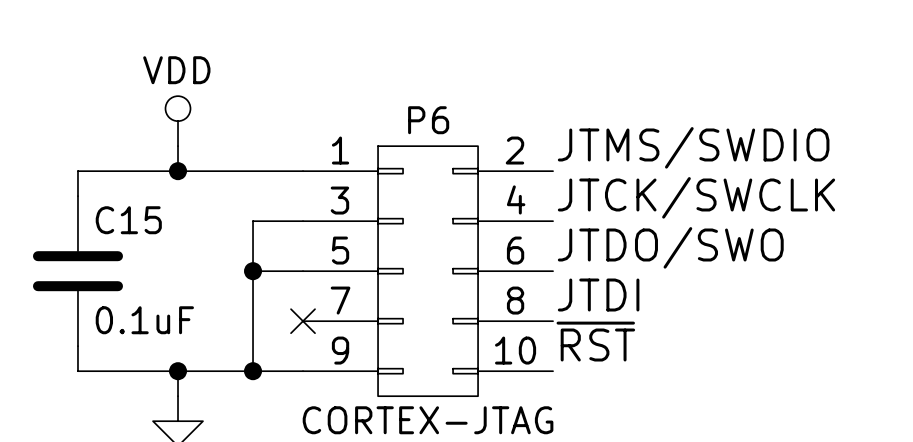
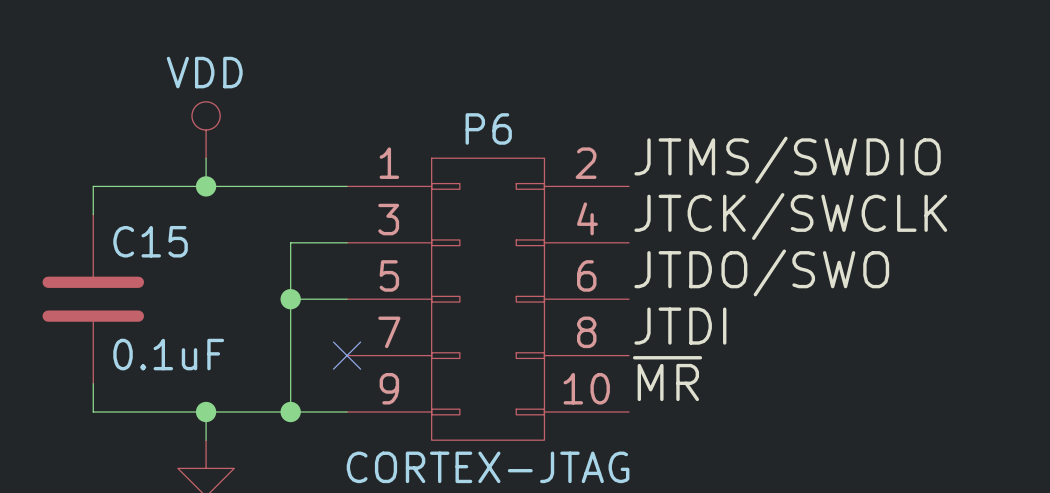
label: ~{RST} (595, 341) -> ~{MR} (667, 378)

